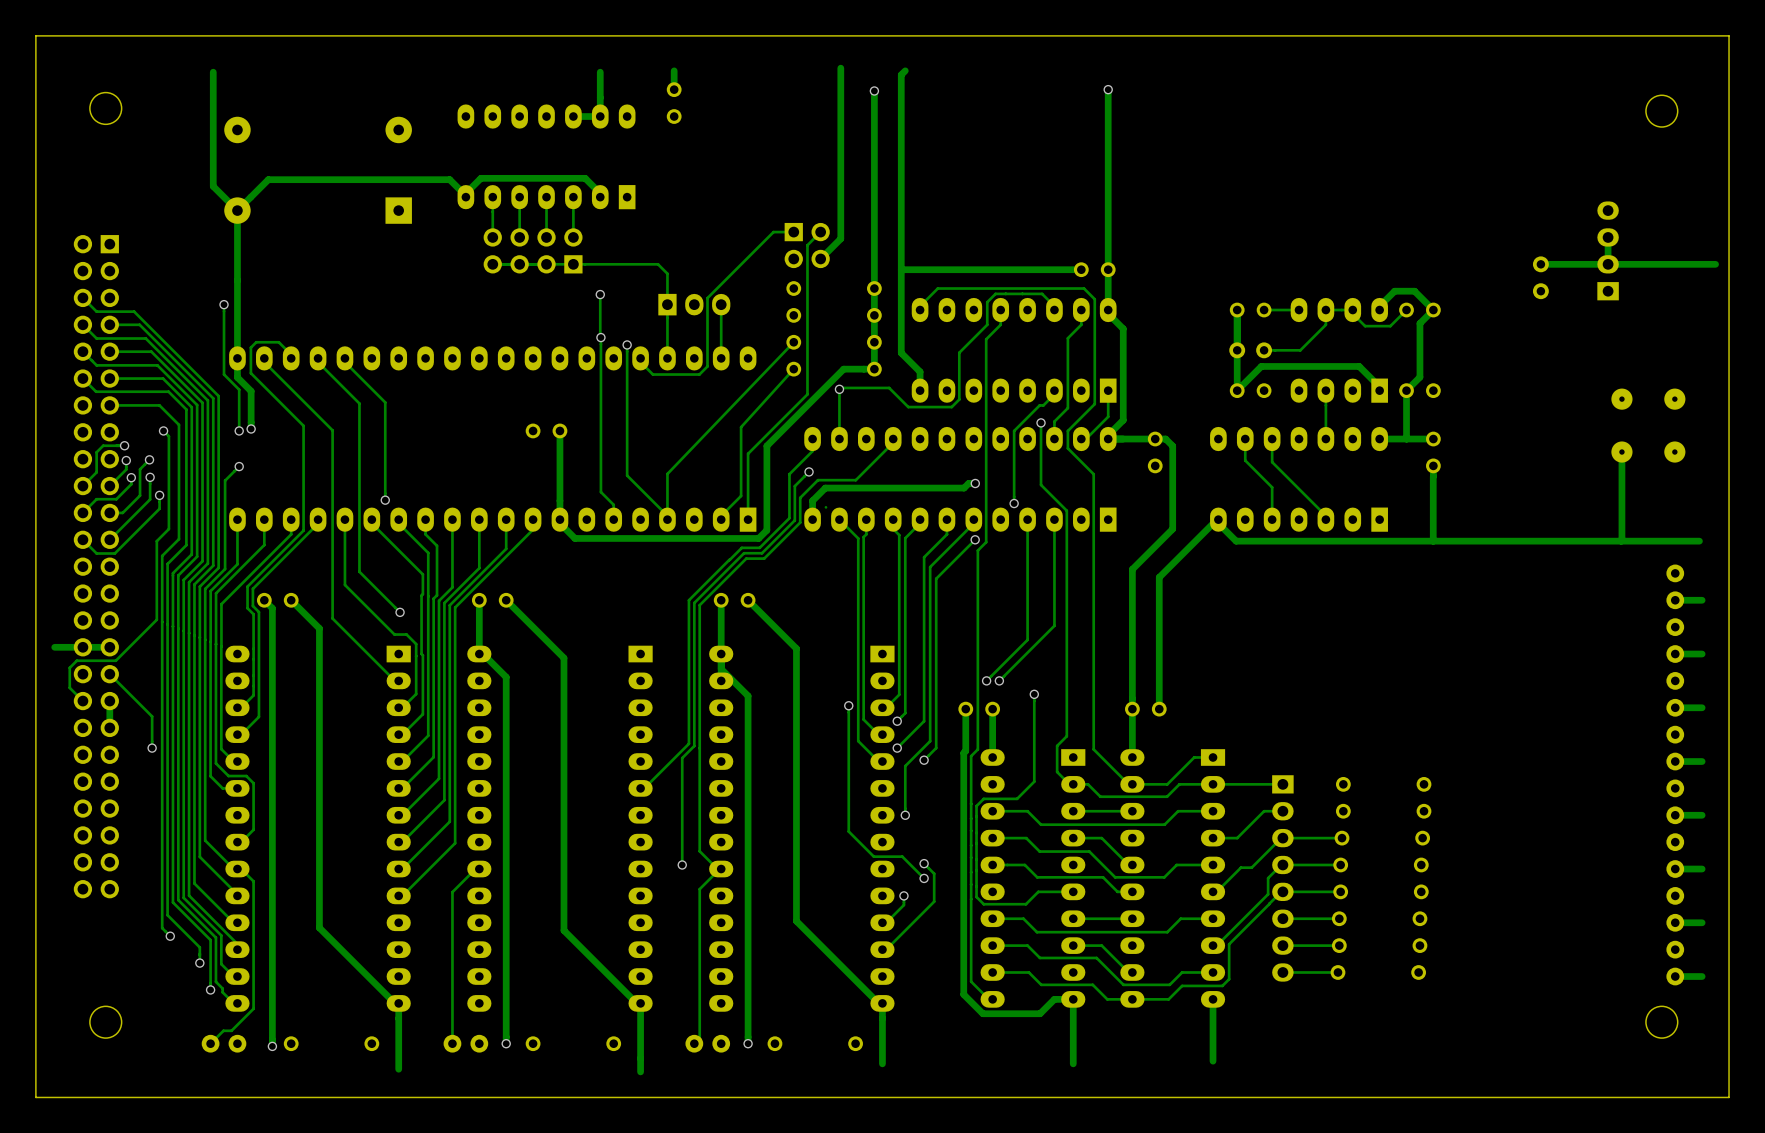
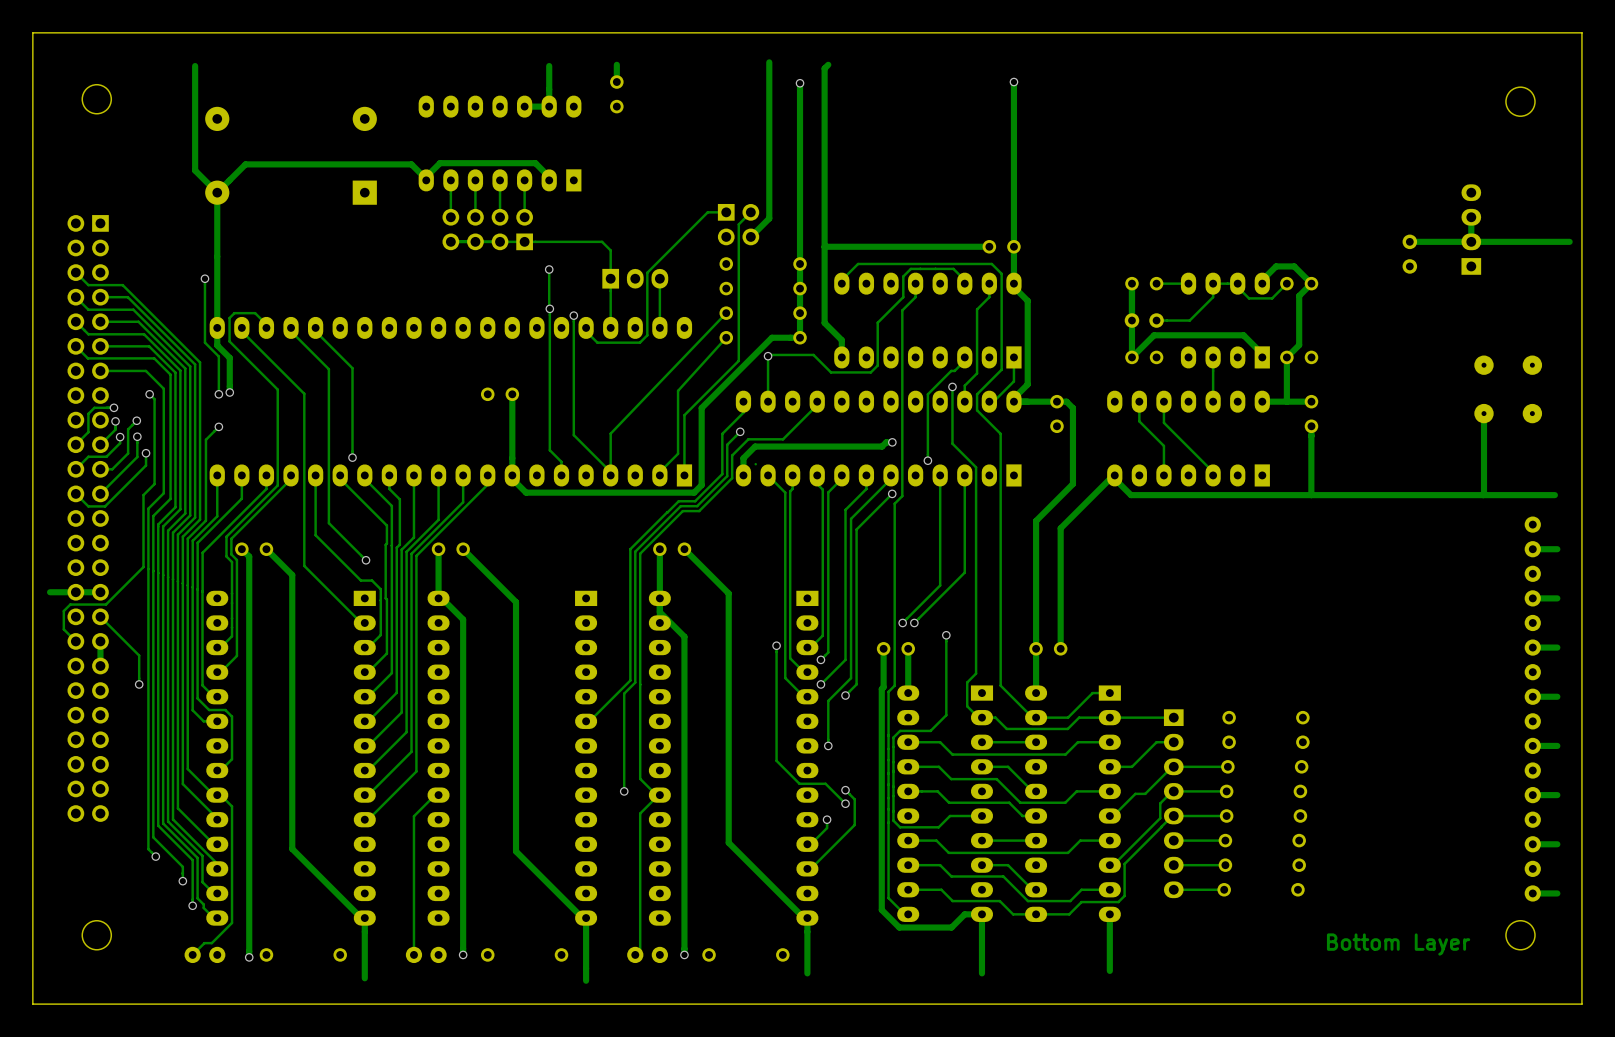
text: none -> Bottom Layer (1398, 944)

